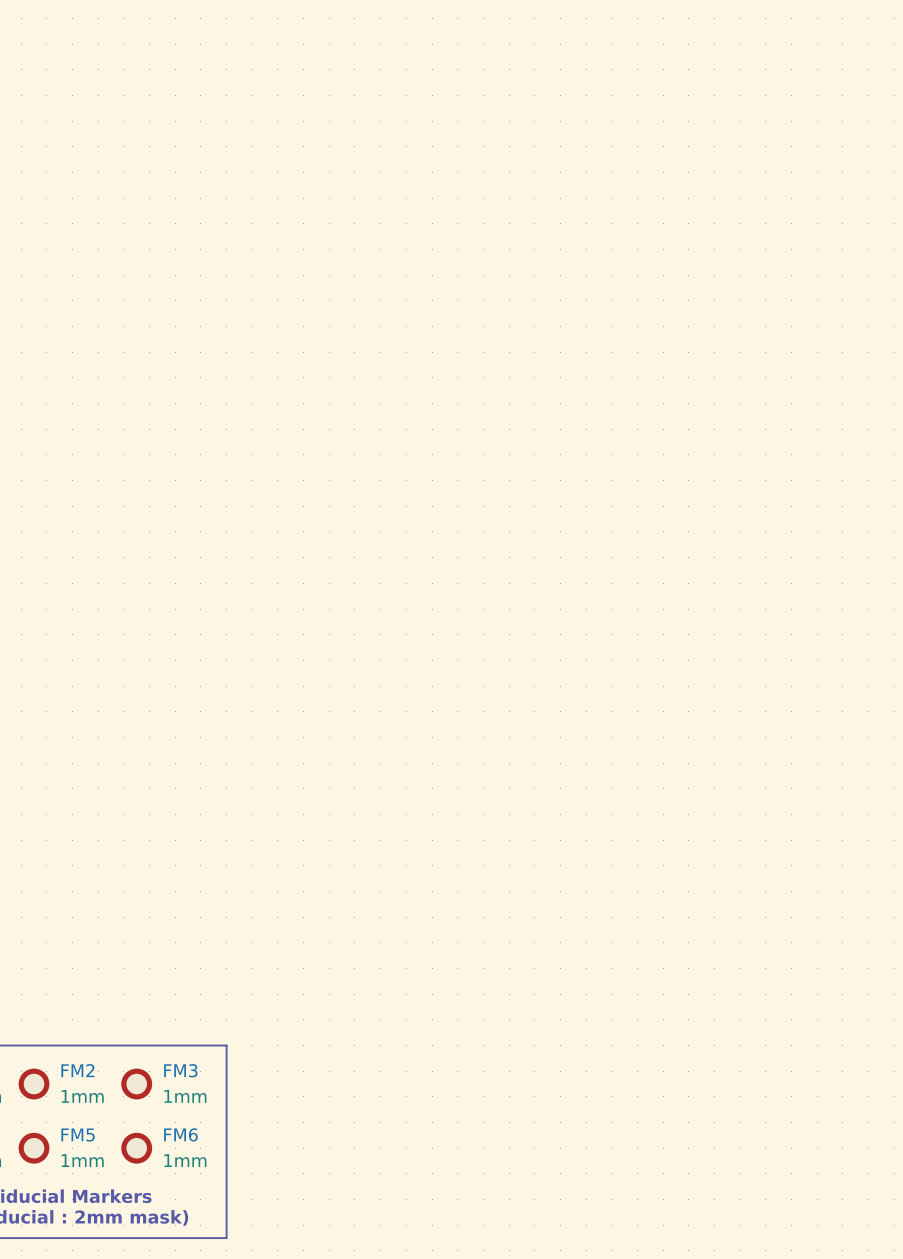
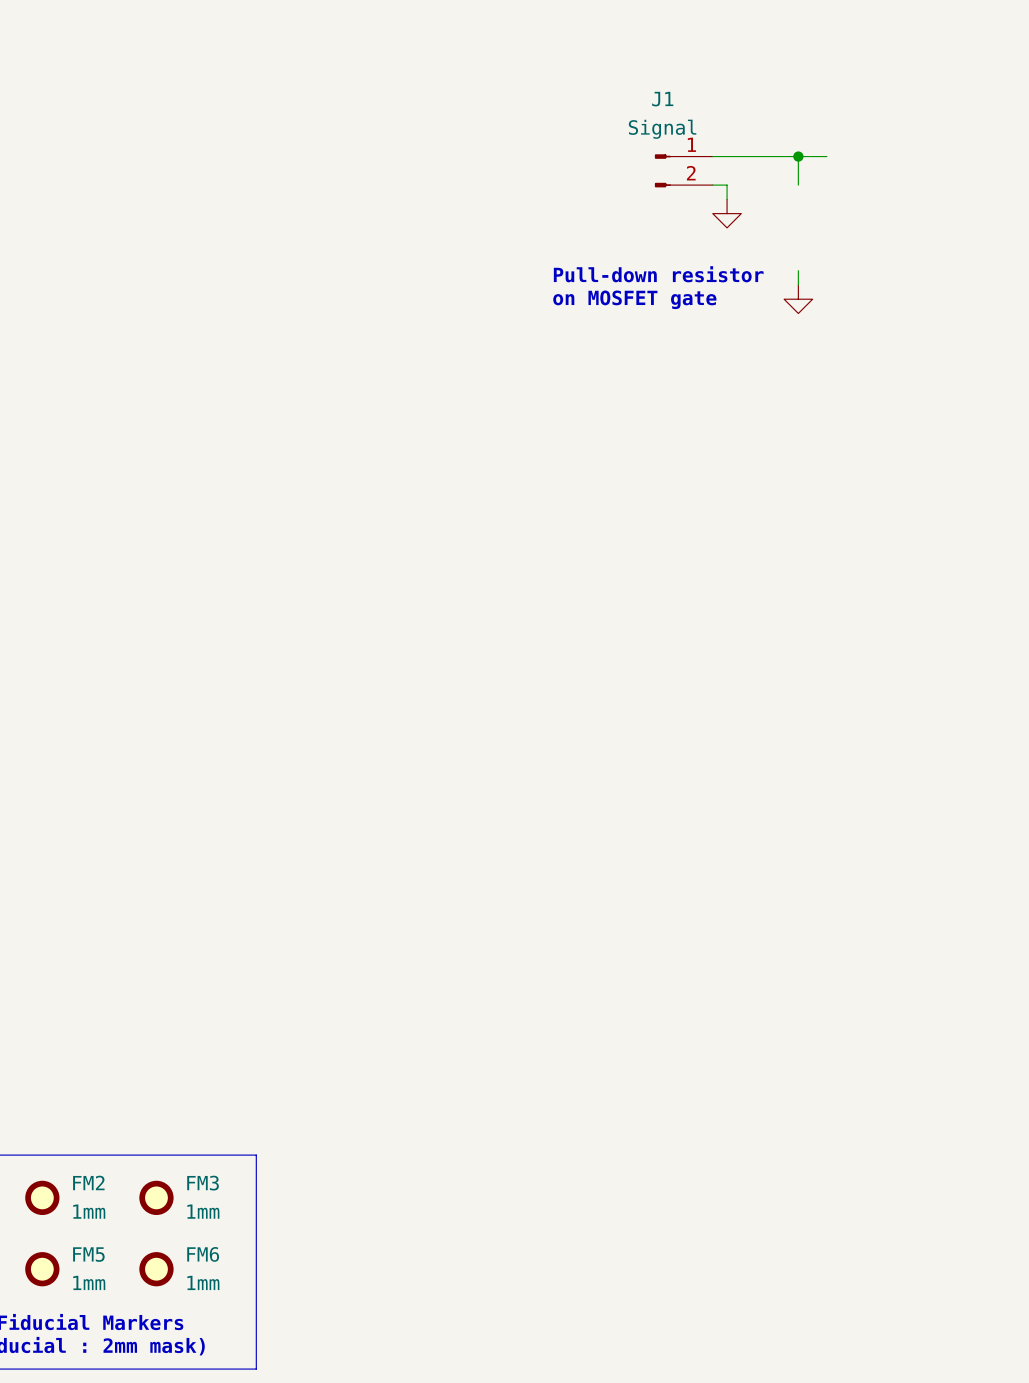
wire: none -> (712, 156) (826, 156)
wire: none -> (798, 156) (798, 185)
junction: none -> (798, 156)
J1: none -> Signal (683, 170)
wire: none -> (712, 185) (727, 185) (727, 199)
power symbol: none -> (727, 213)
wire: none -> (798, 270) (798, 284)
text: none -> Pull-down resistor (658, 274)
text: none -> on MOSFET gate (634, 299)
power symbol: none -> (798, 299)

